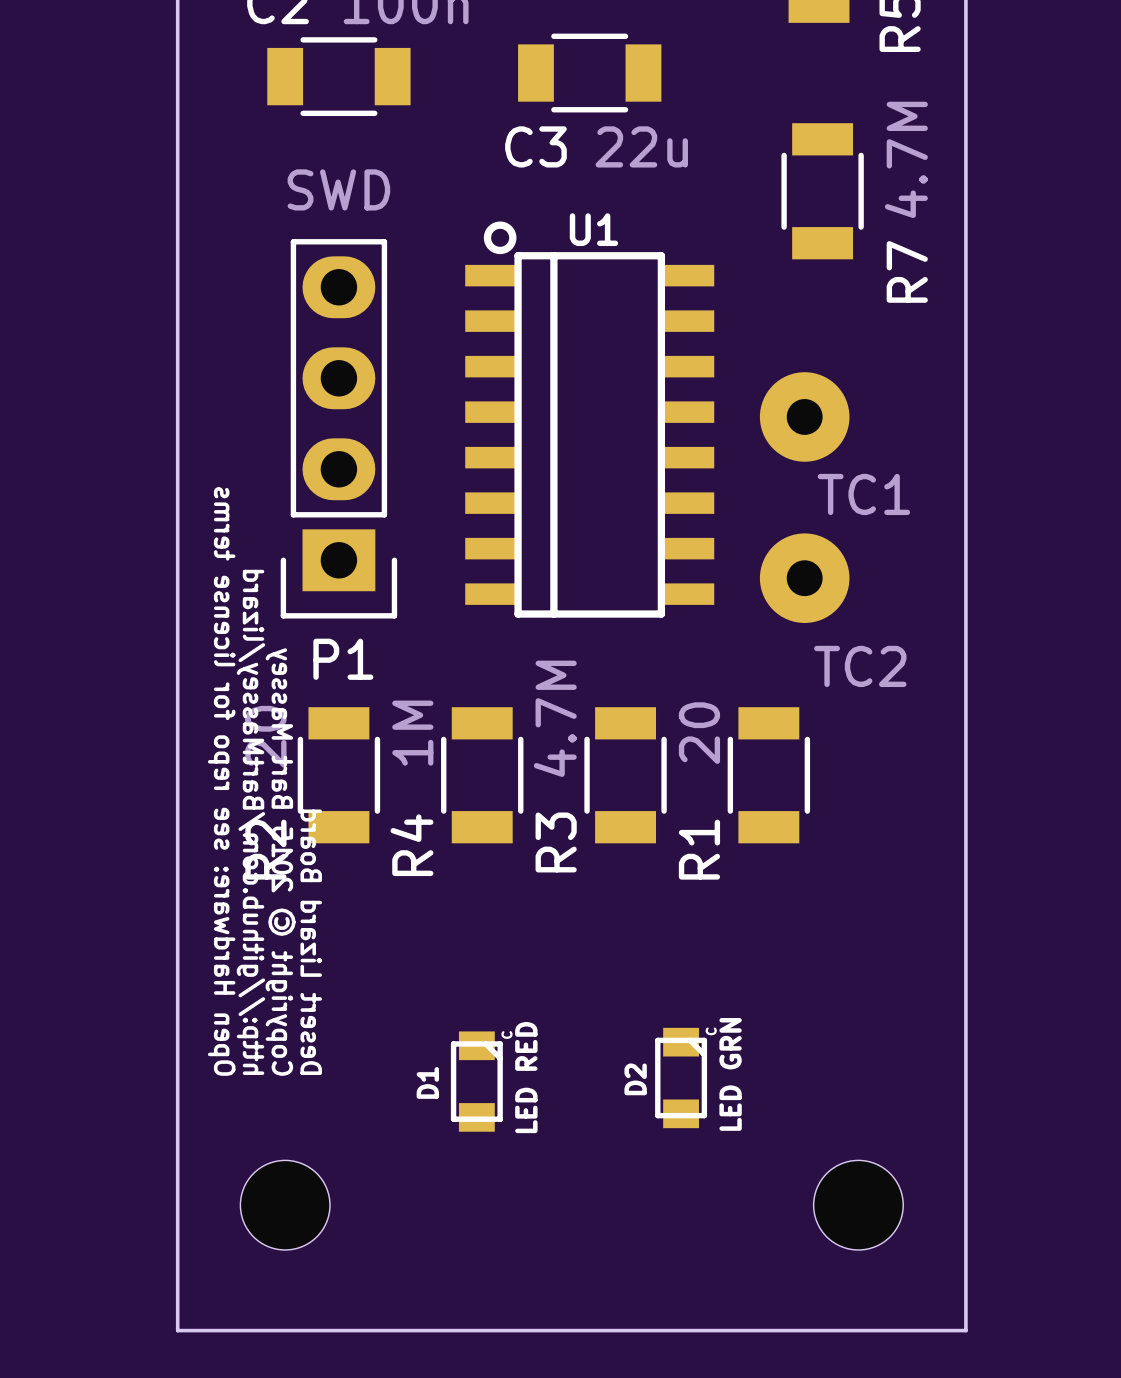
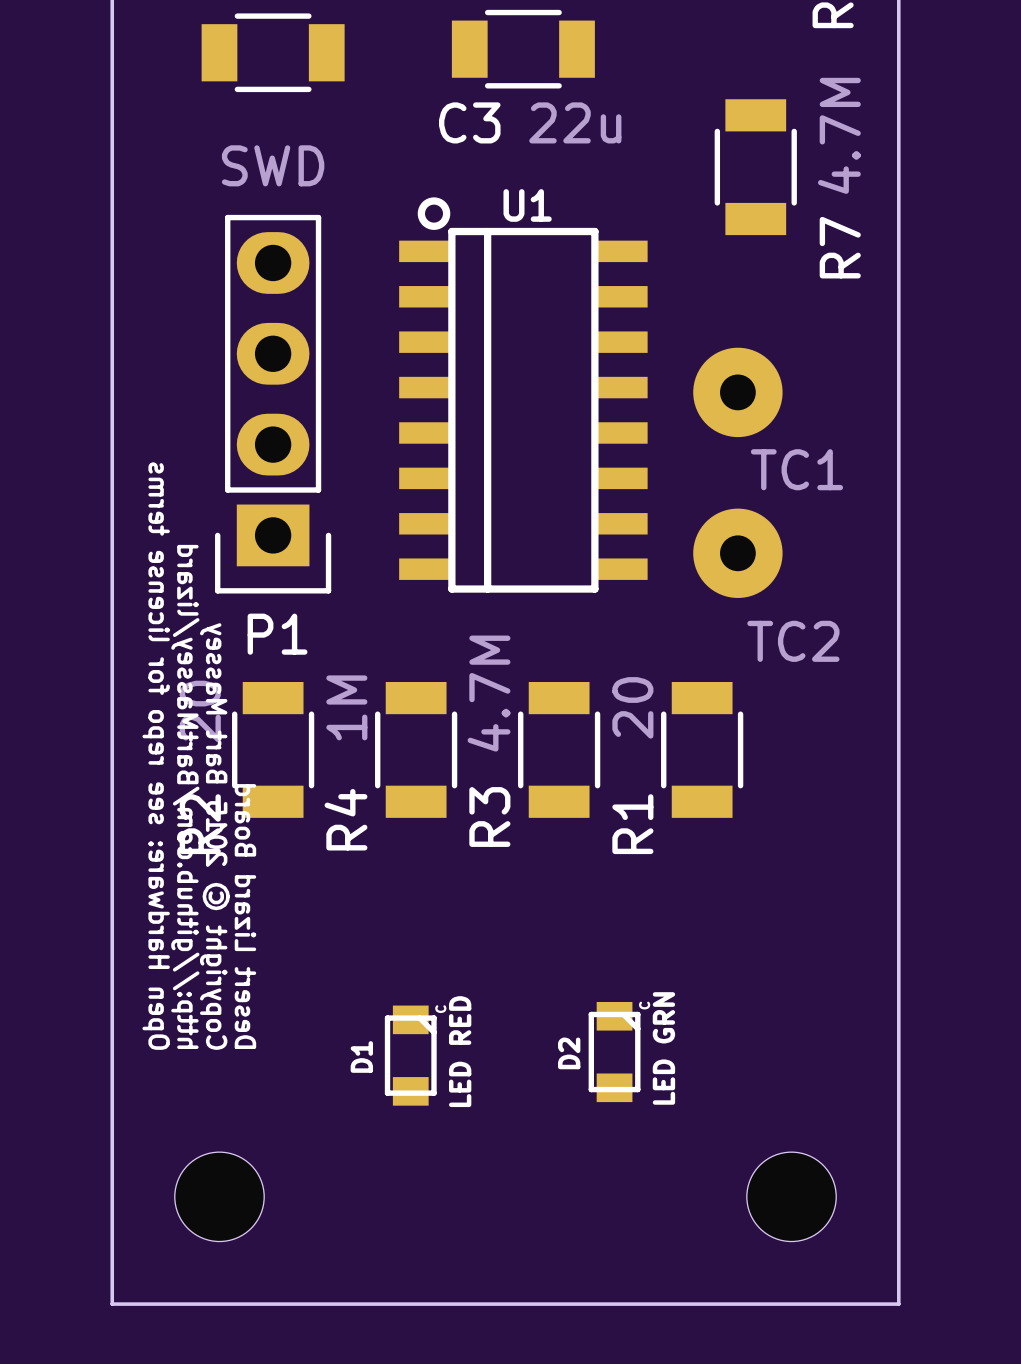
part position: (285, 1205) -> (219, 1196)
part position: (858, 1205) -> (791, 1196)

